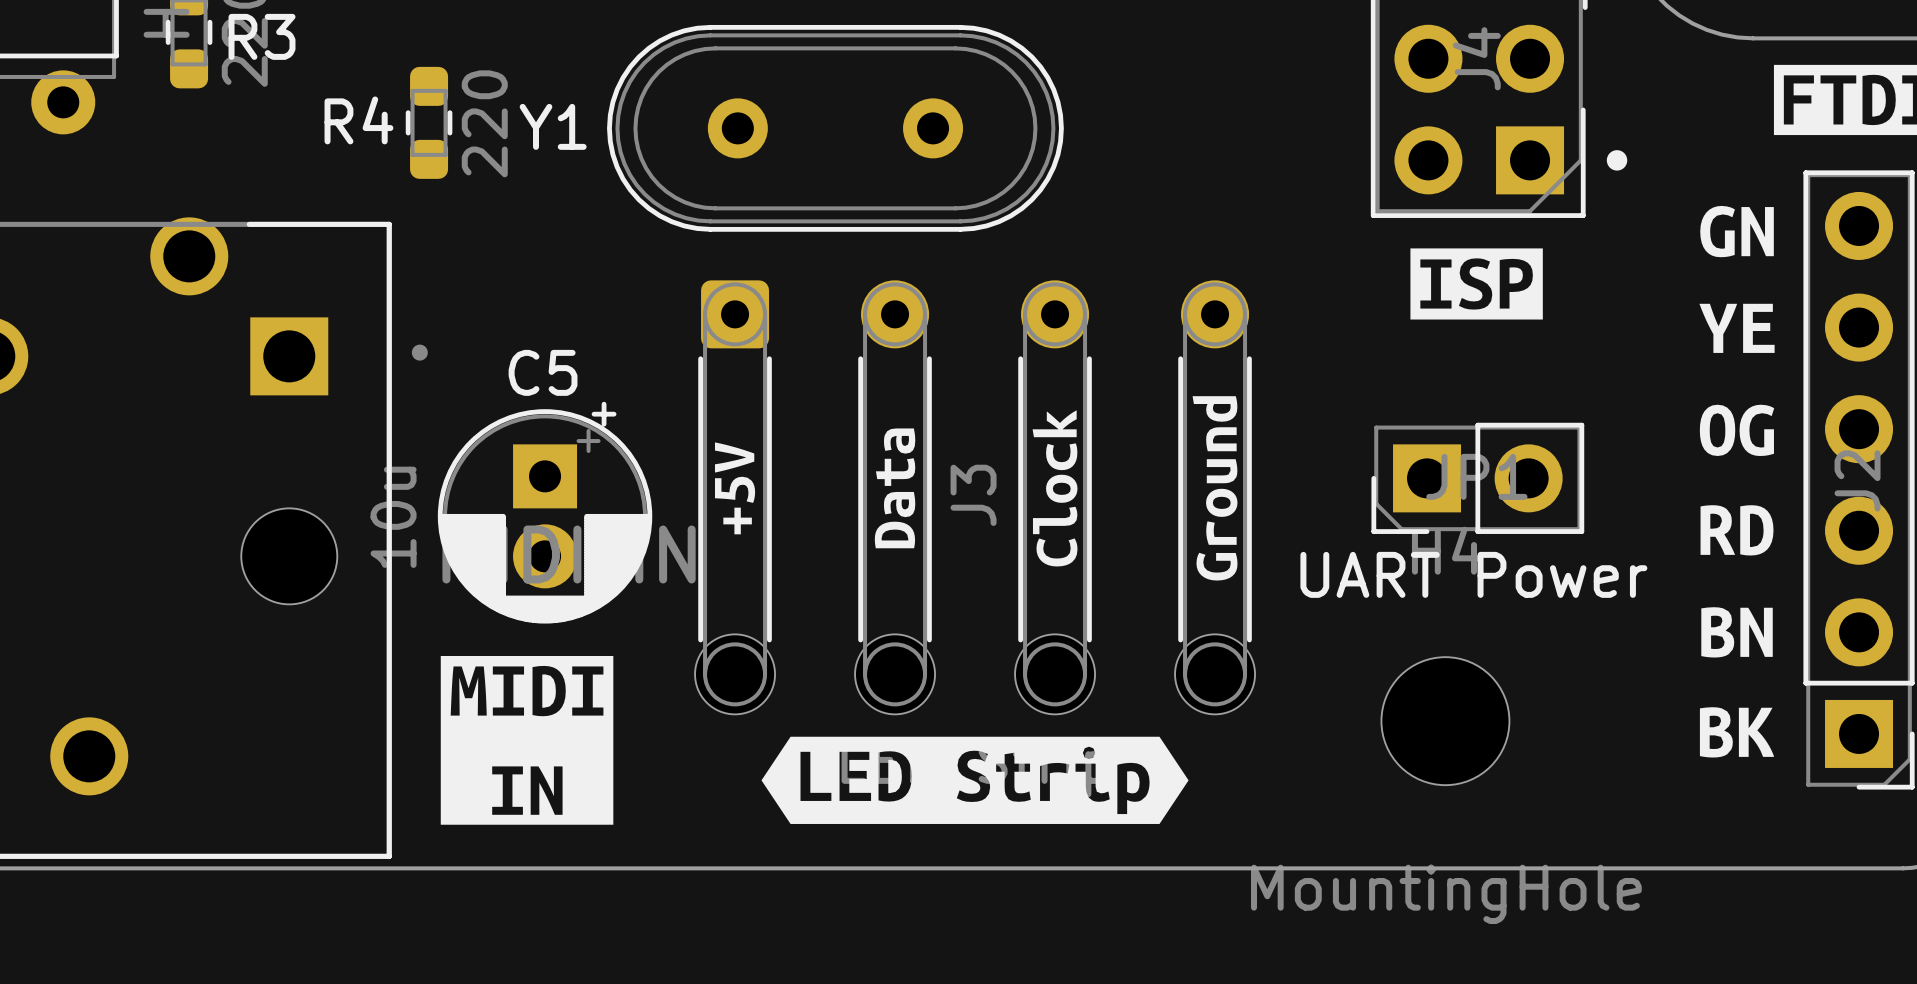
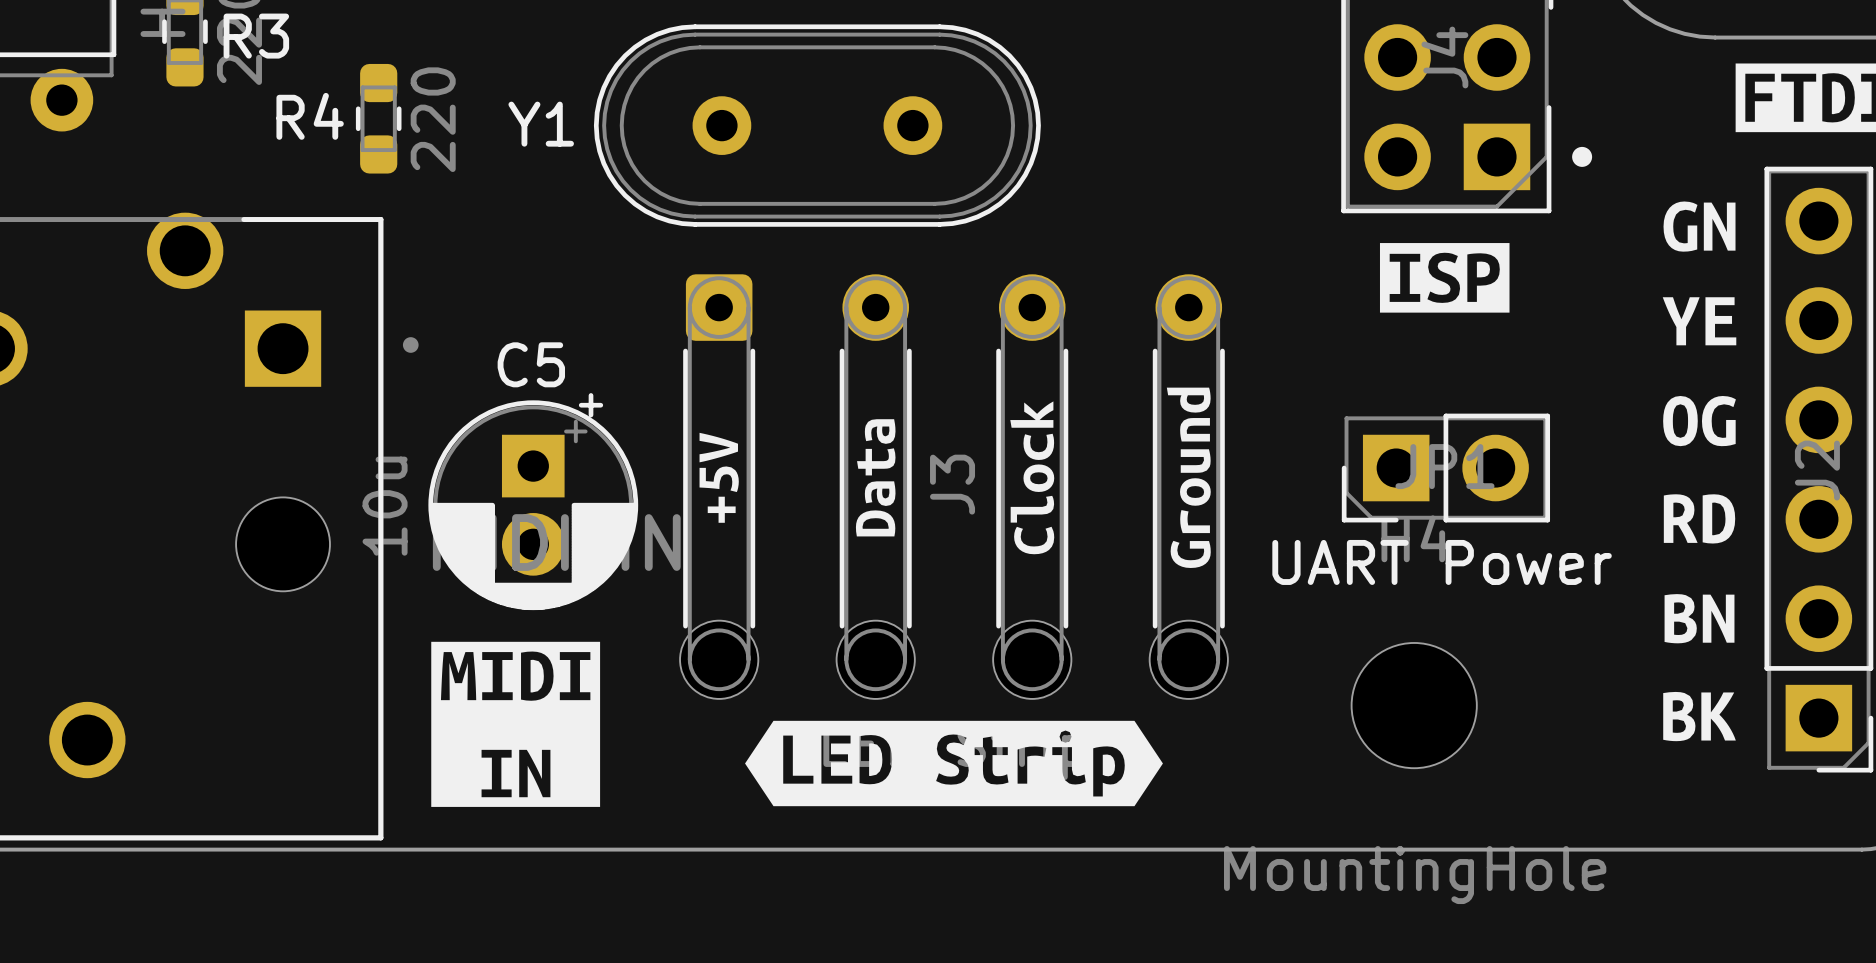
R4 position: (429, 122) -> (378, 118)

